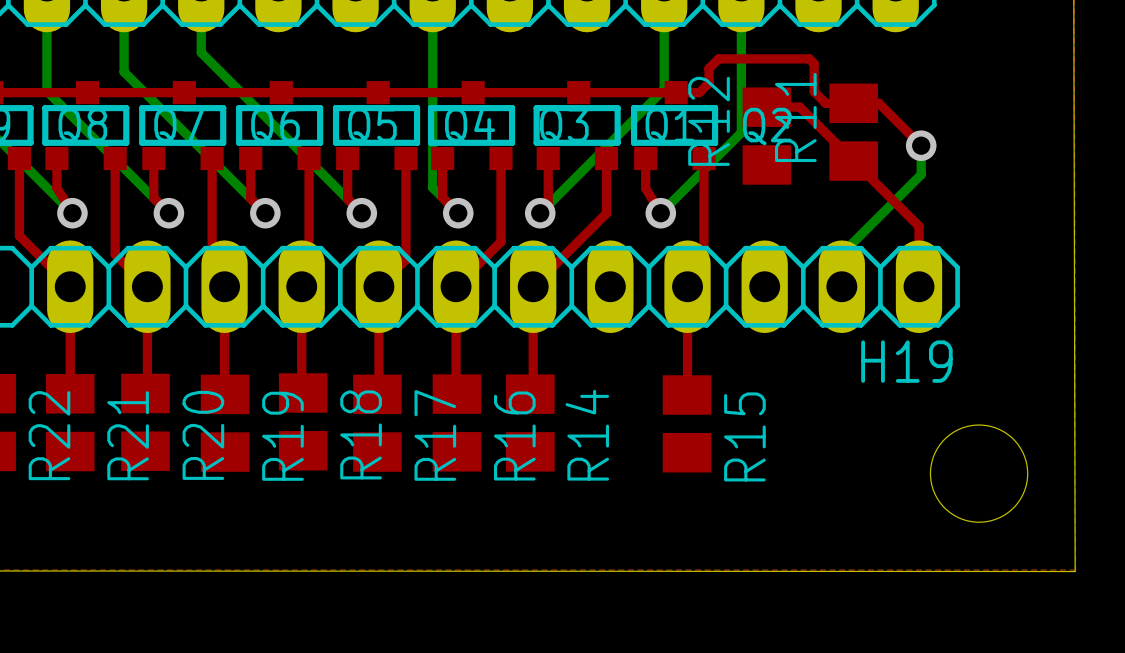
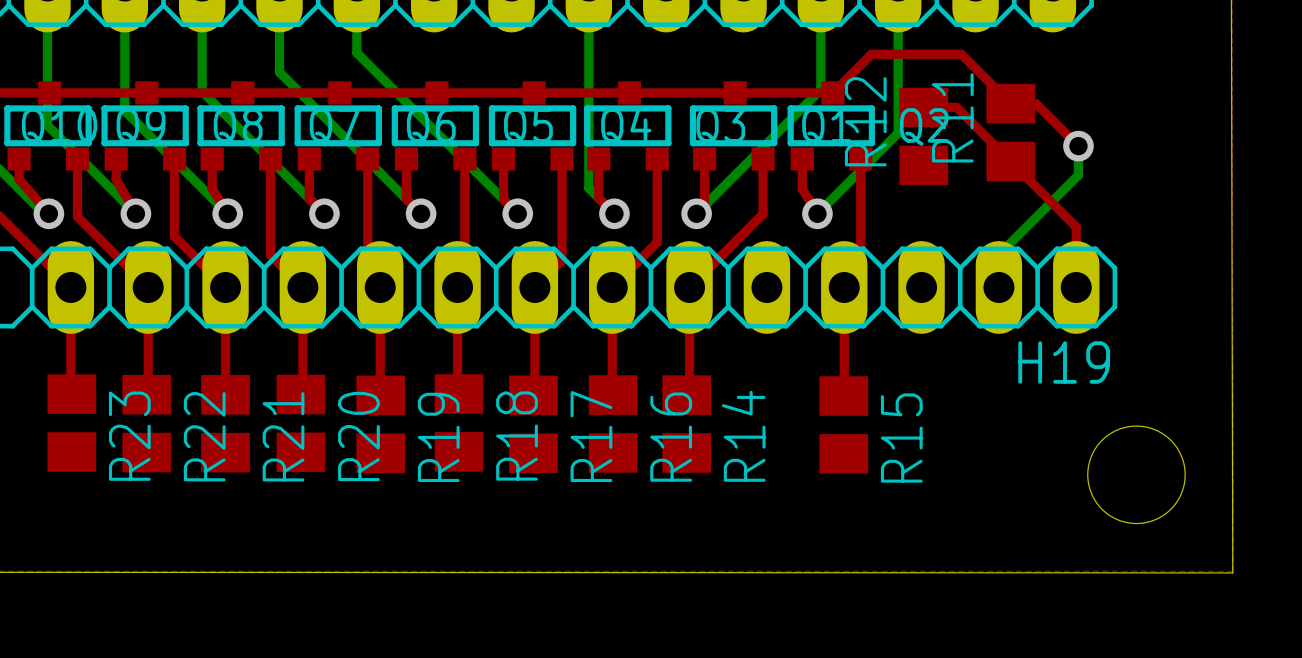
top track: (809, 58) (718, 58) (709, 68) (709, 83) (699, 92) (676, 92) -> (966, 59) (961, 54) (871, 54) (832, 92)
top track: (814, 63) (814, 91) (825, 103) (853, 103) -> (971, 64) (1010, 103)

